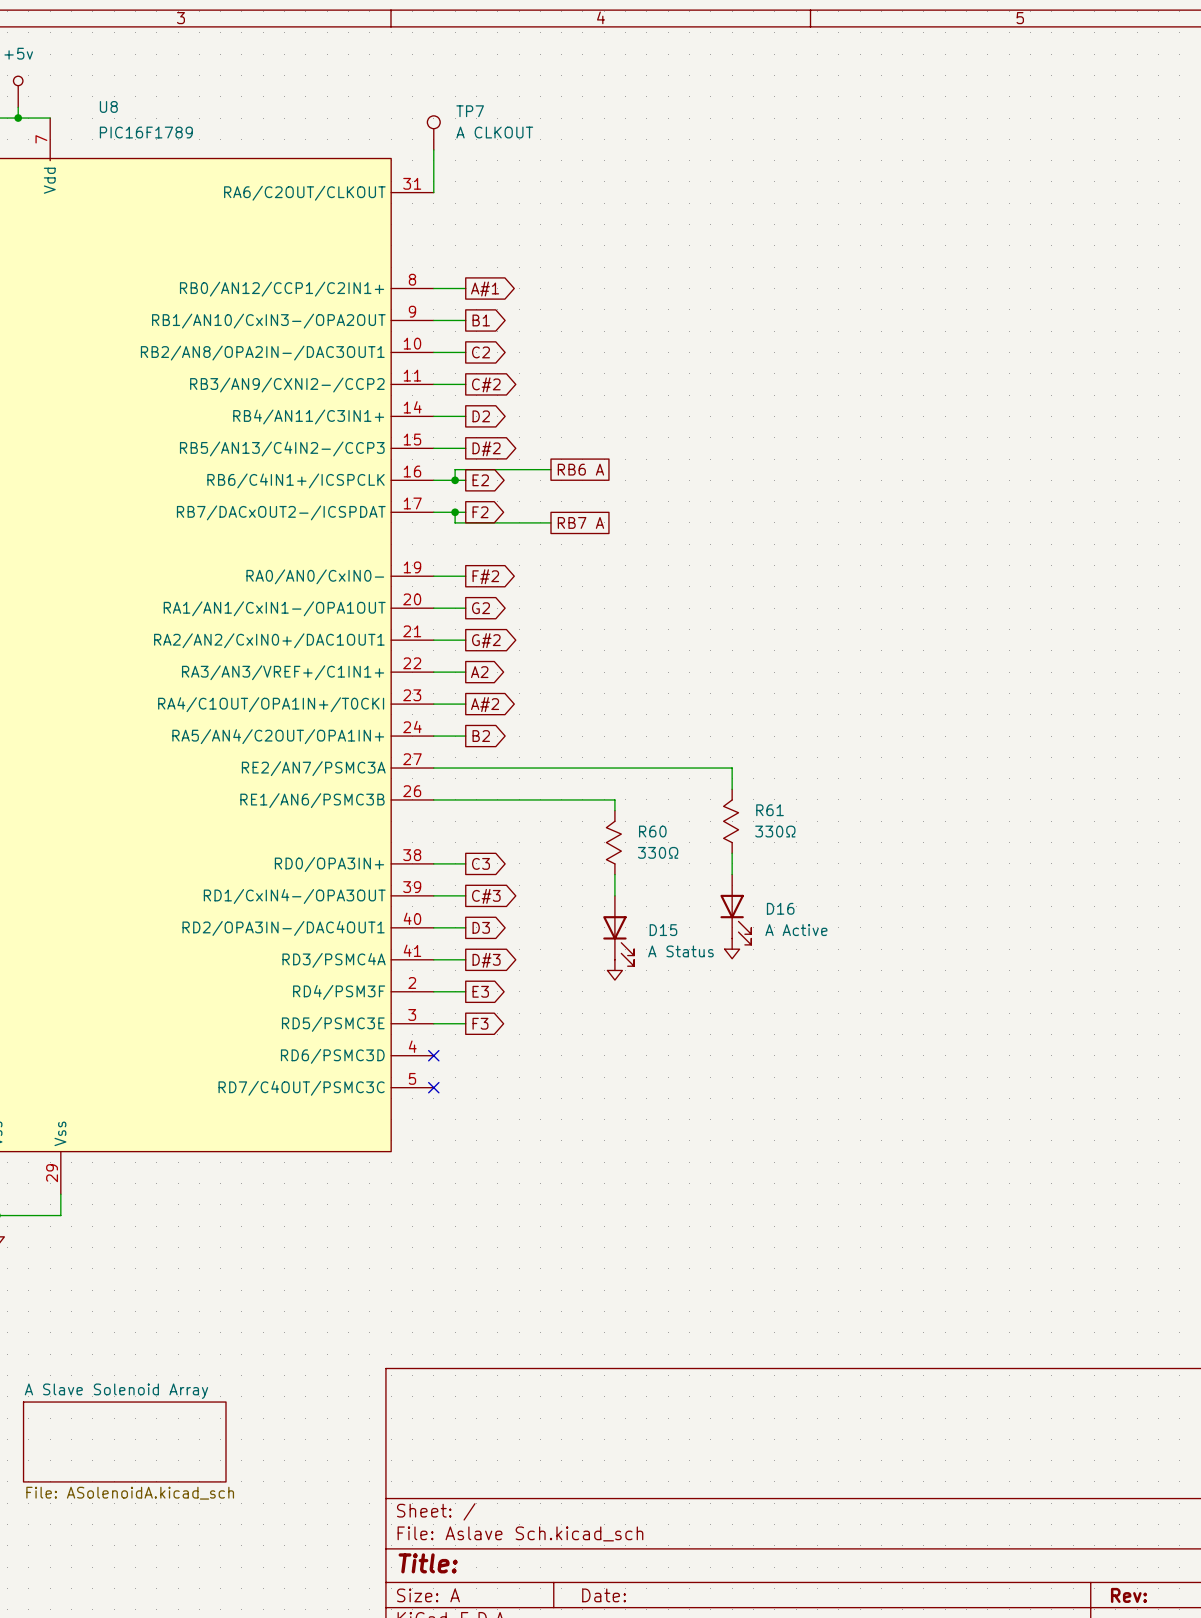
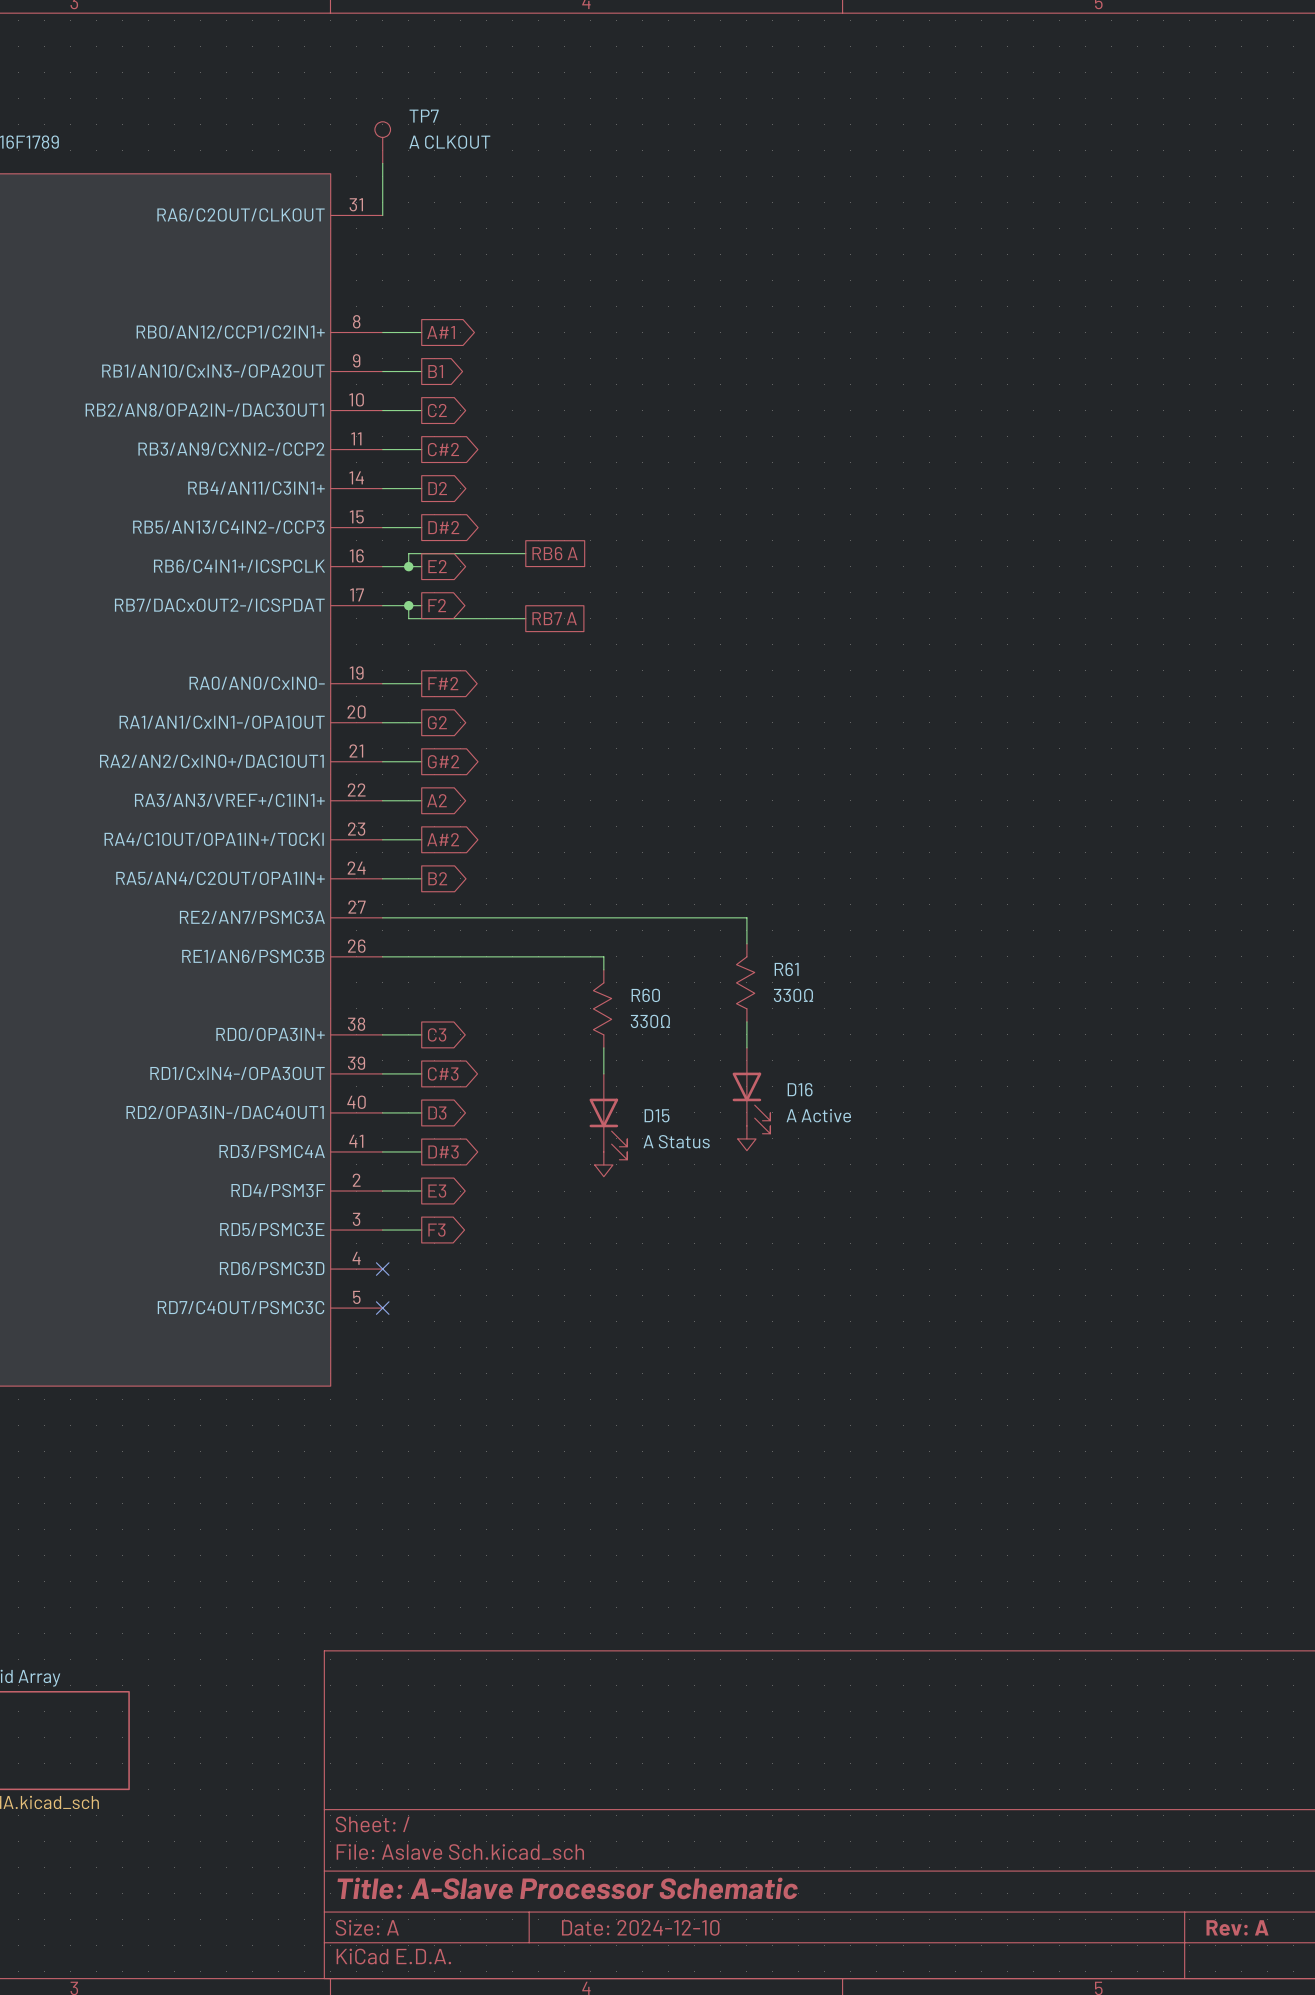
title block: Title: (428, 1563) -> Title: A-Slave Processor Schematic (567, 1888)
title block: Date: (604, 1595) -> Date: 2024-12-10 (640, 1927)
title block: Rev: (1128, 1595) -> Rev: A (1237, 1927)

